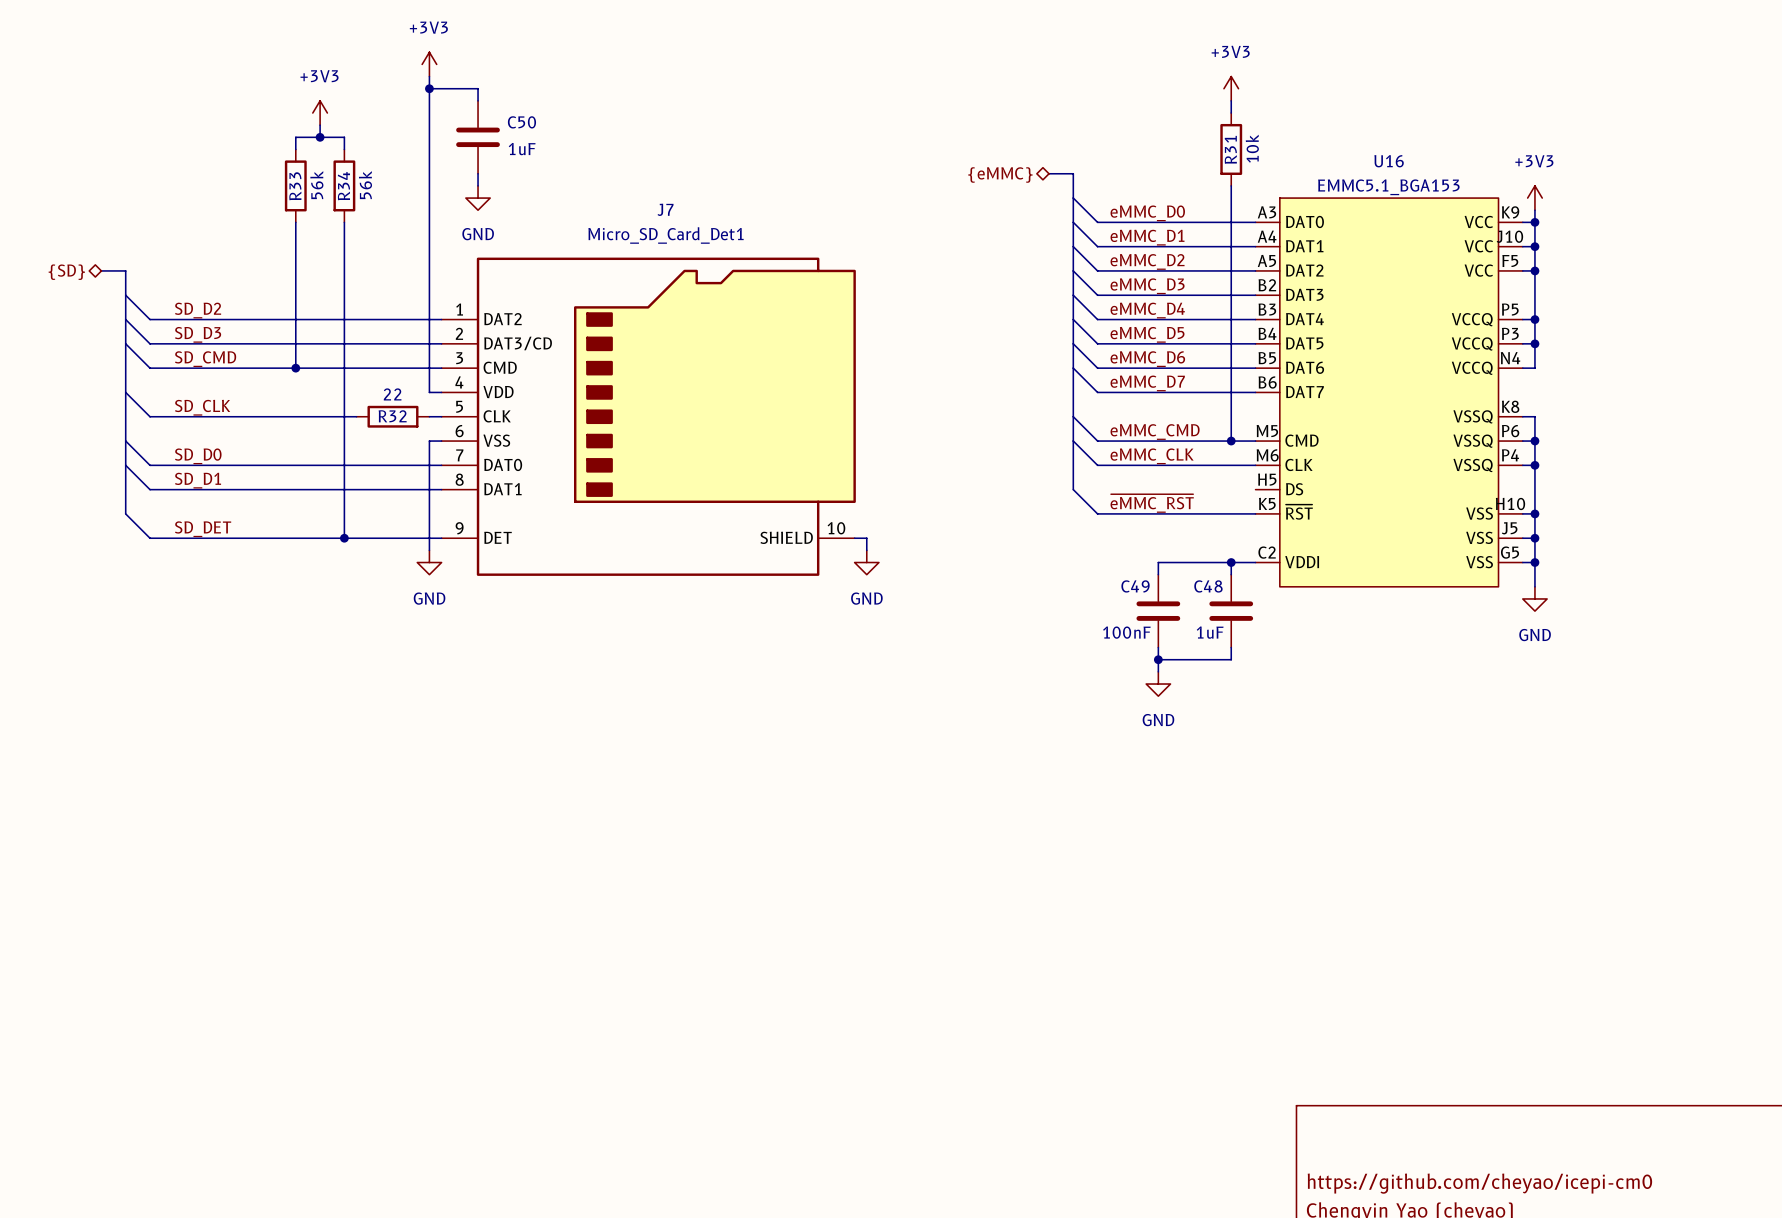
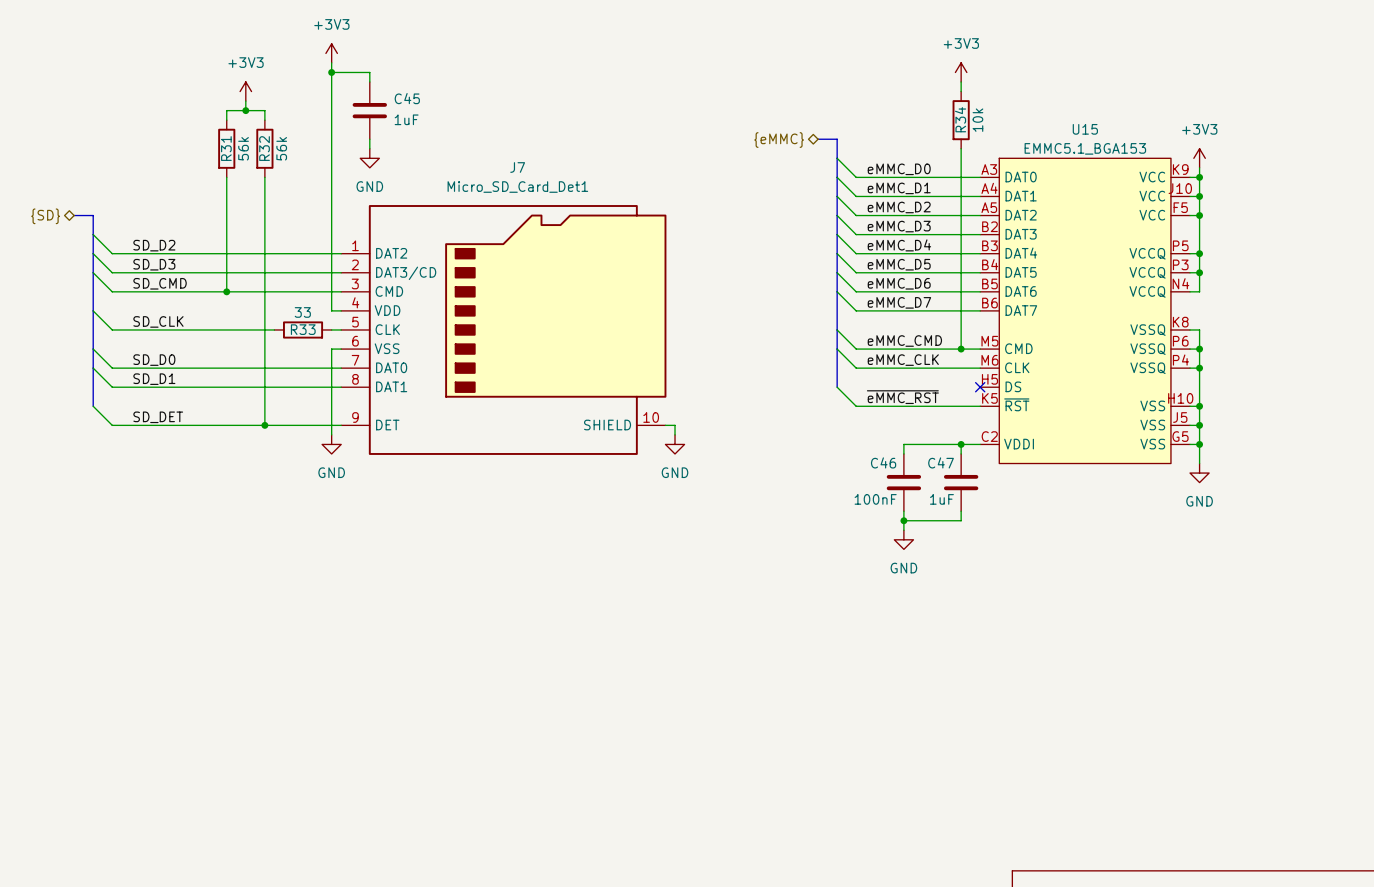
C50 name: C50 (521, 122) -> C45 (407, 98)
R31 name: R31 (1230, 149) -> R34 (960, 119)
U16 name: U16 (1389, 161) -> U15 (1085, 129)
R33 name: R33 (295, 186) -> R31 (226, 148)
R34 name: R34 (343, 186) -> R32 (264, 148)
R32 value: 22 (392, 394) -> 33 (302, 312)
R32 name: R32 (392, 416) -> R33 (303, 329)
no-connect mark: none -> (980, 387)
C49 name: C49 (1135, 586) -> C46 (883, 462)
C48 name: C48 (1208, 586) -> C47 (941, 462)

